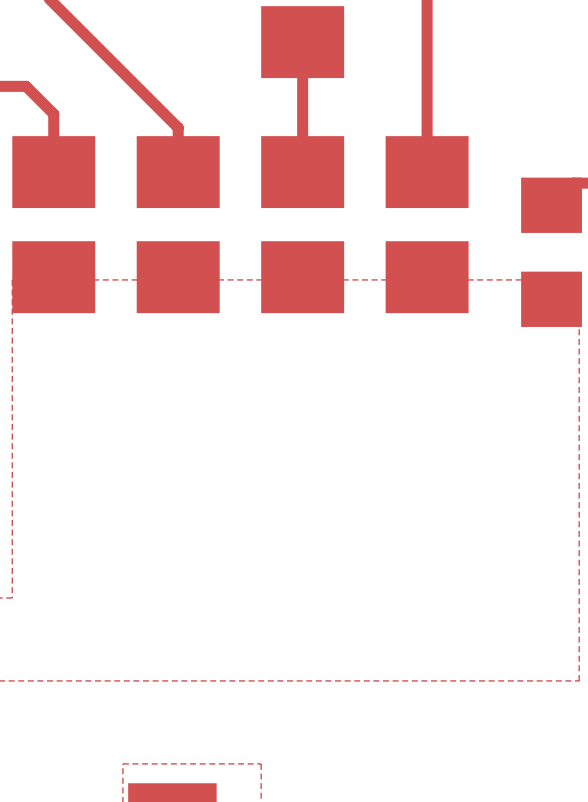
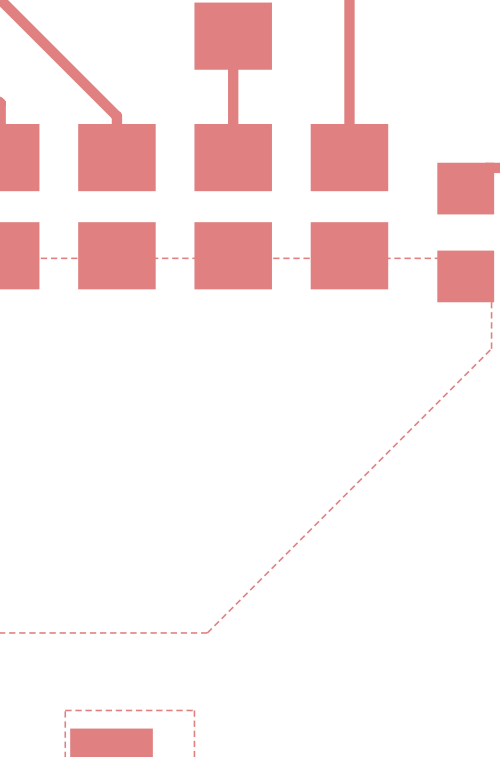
top zone outline: (579, 376) (579, 680) (274, 680) -> (491, 348) (207, 632)

